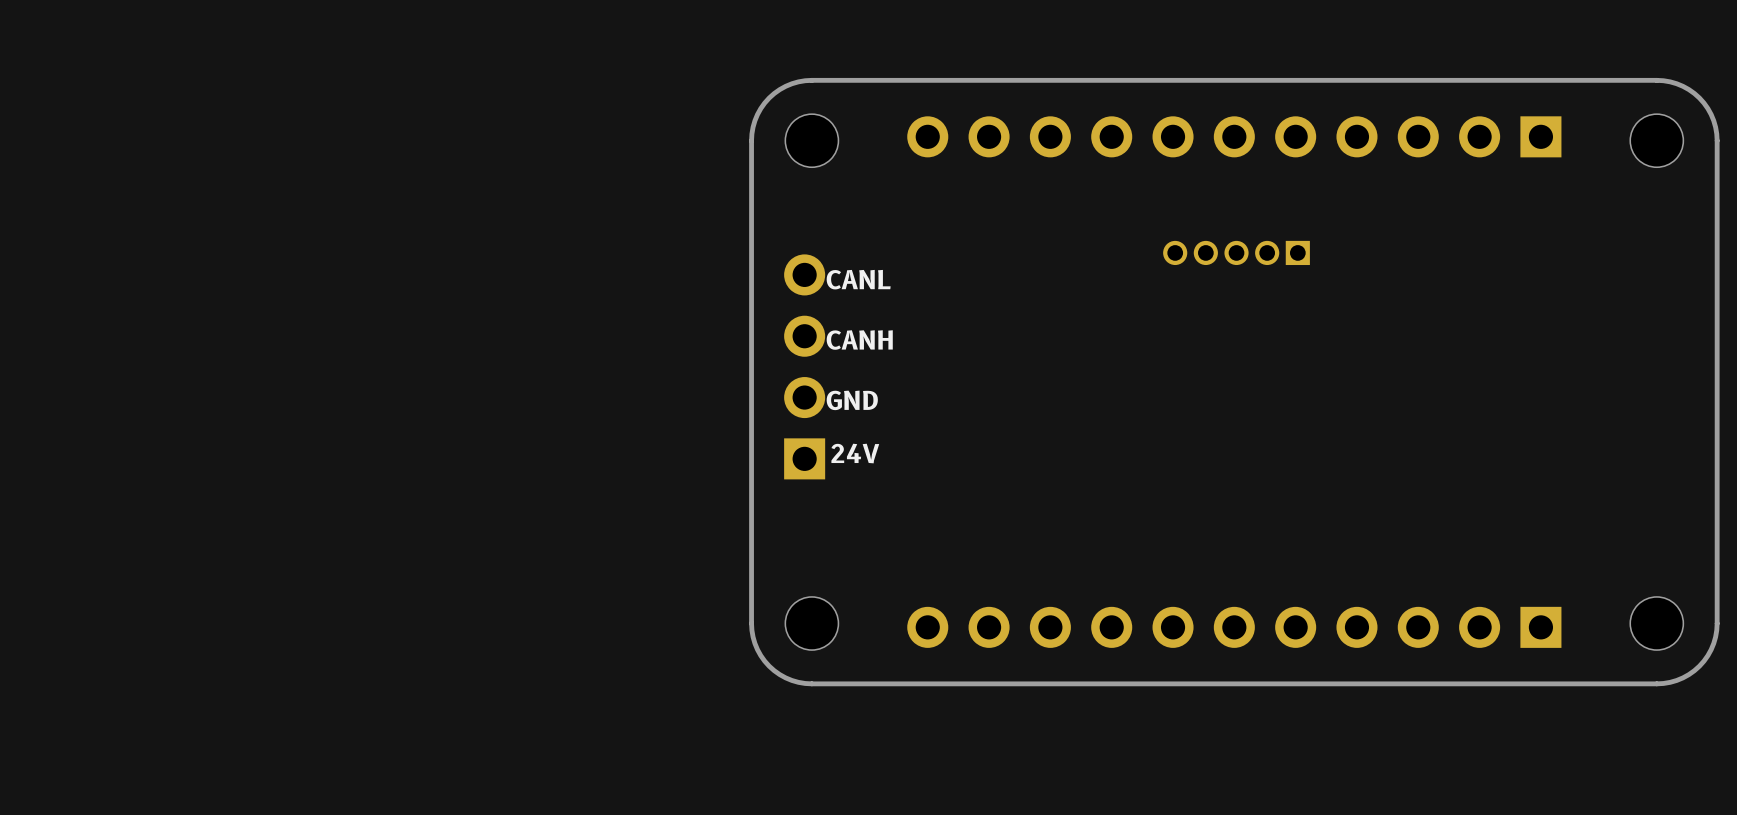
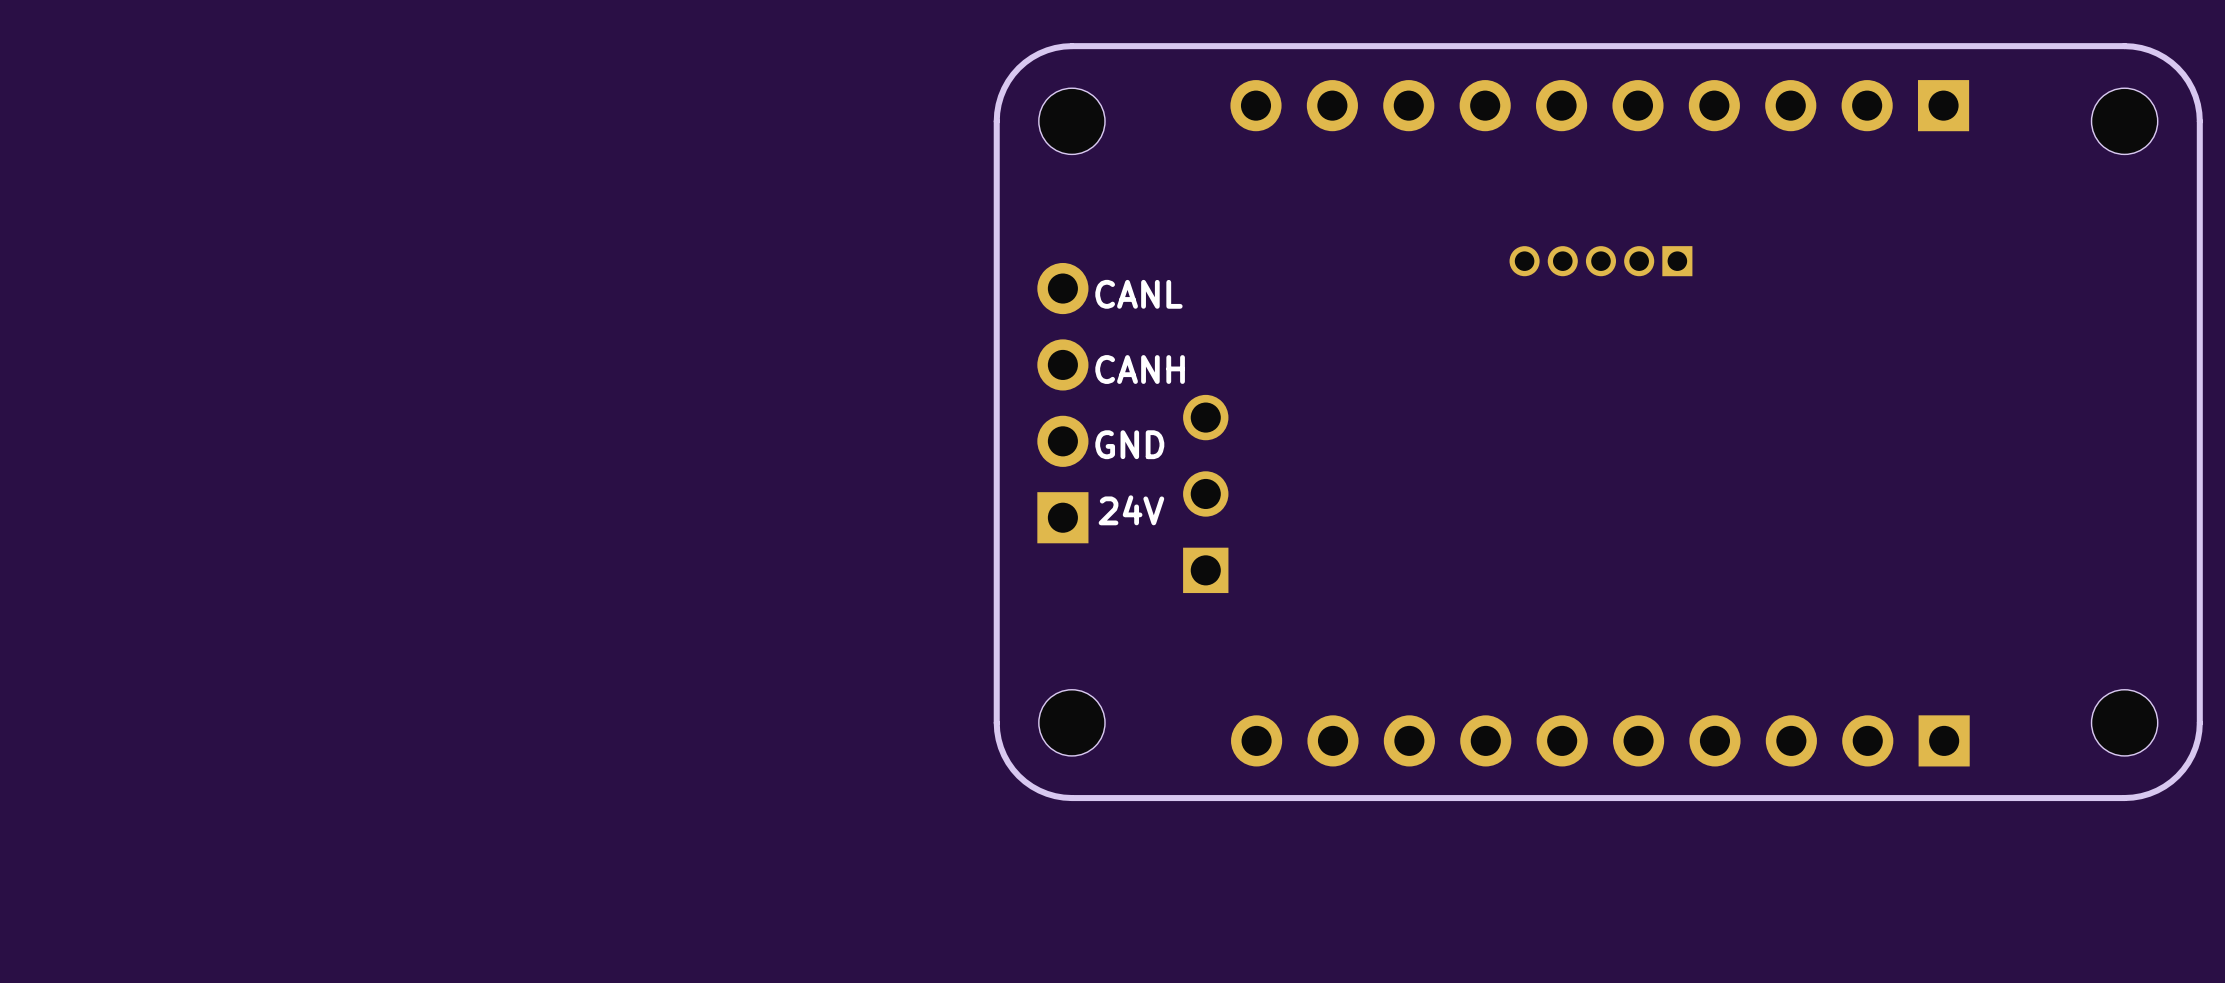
part footprint: [907, 116, 1562, 158] -> [1230, 80, 1970, 132]
part: none -> (1205, 493)
part footprint: [907, 606, 1562, 648] -> [1231, 715, 1970, 767]

